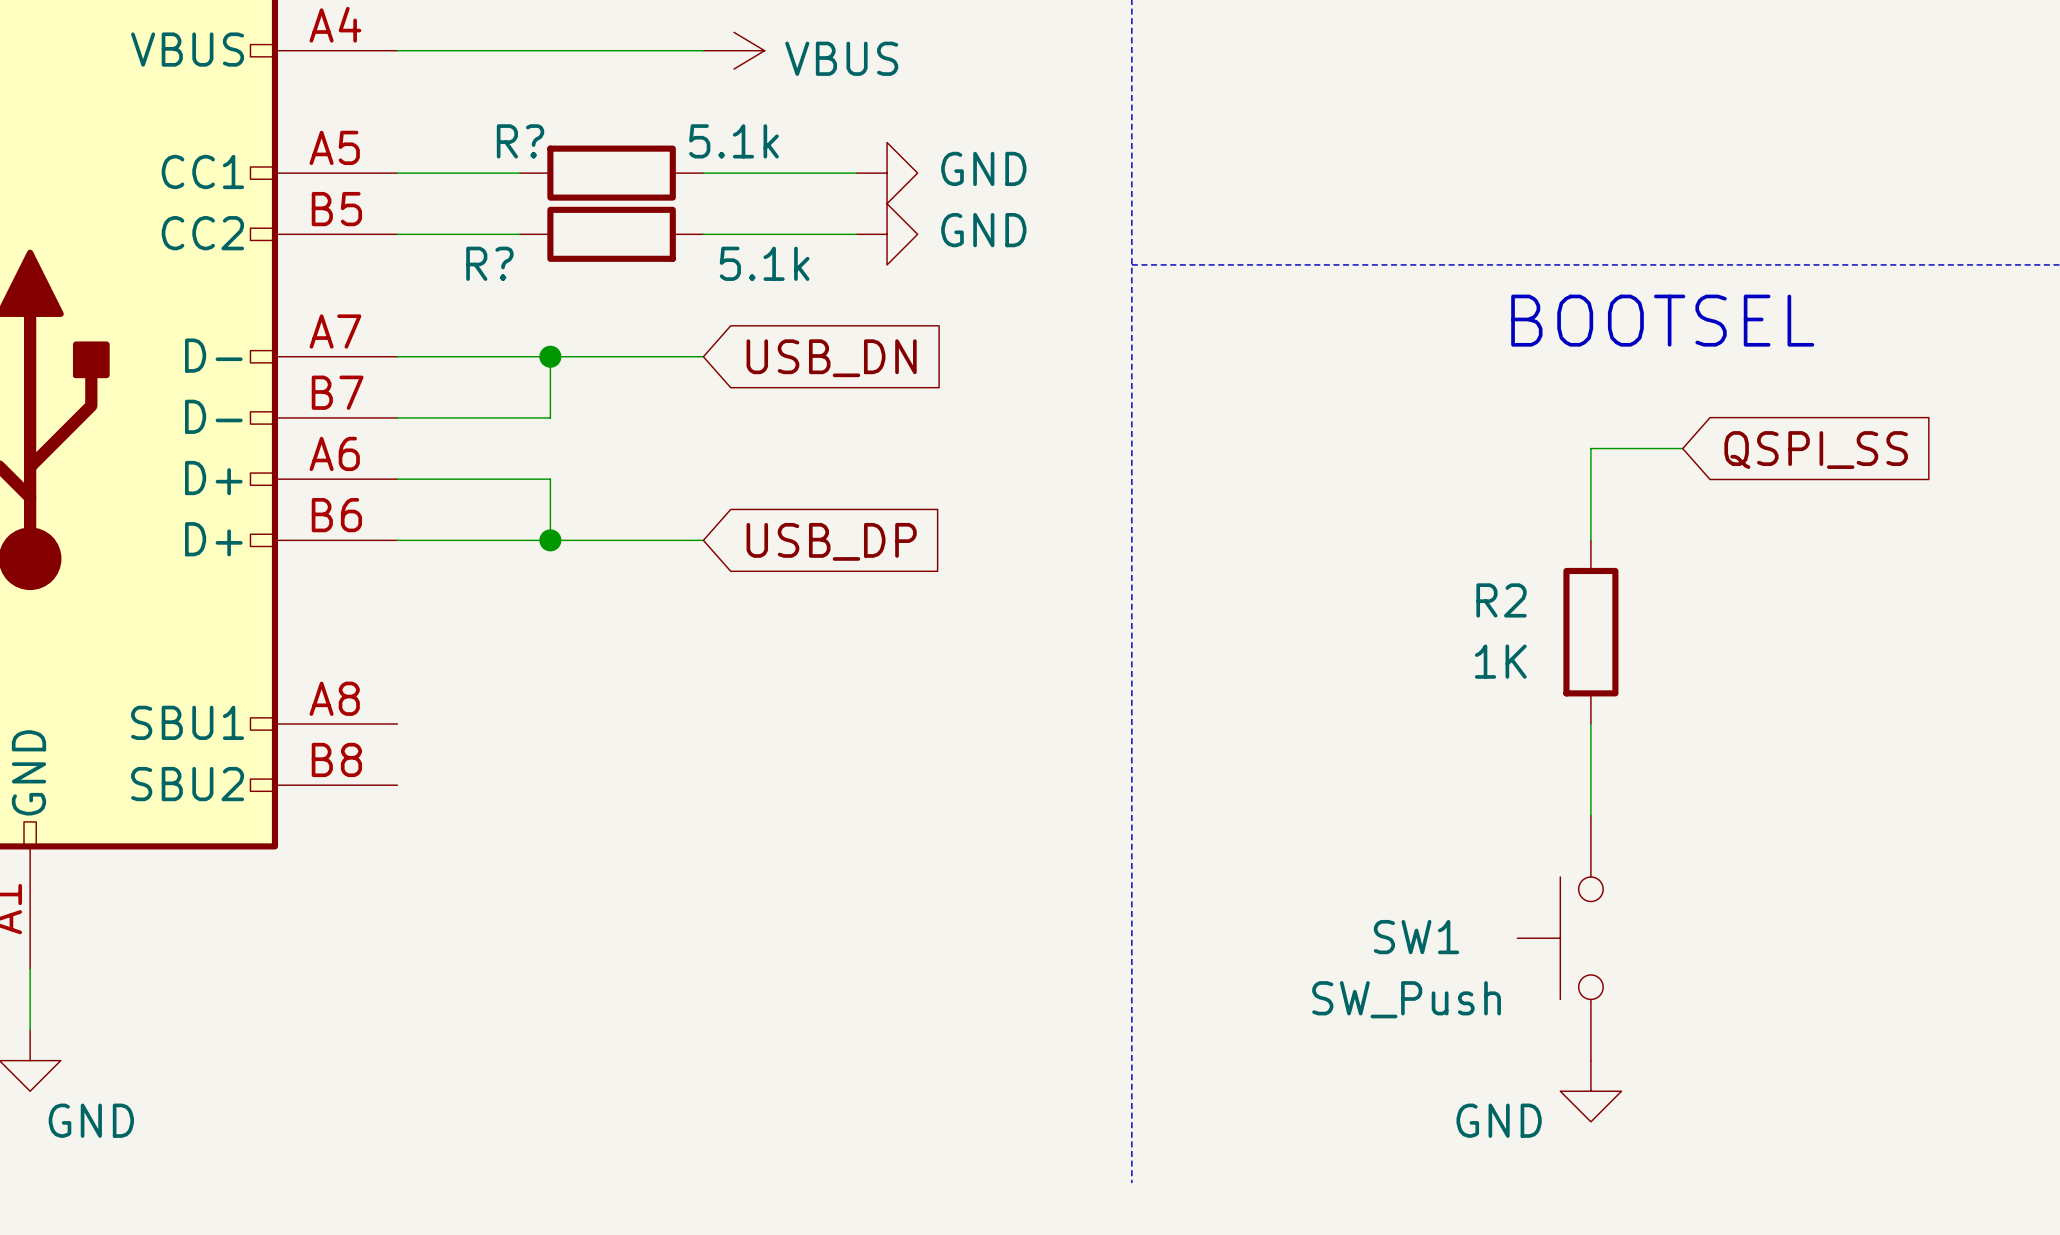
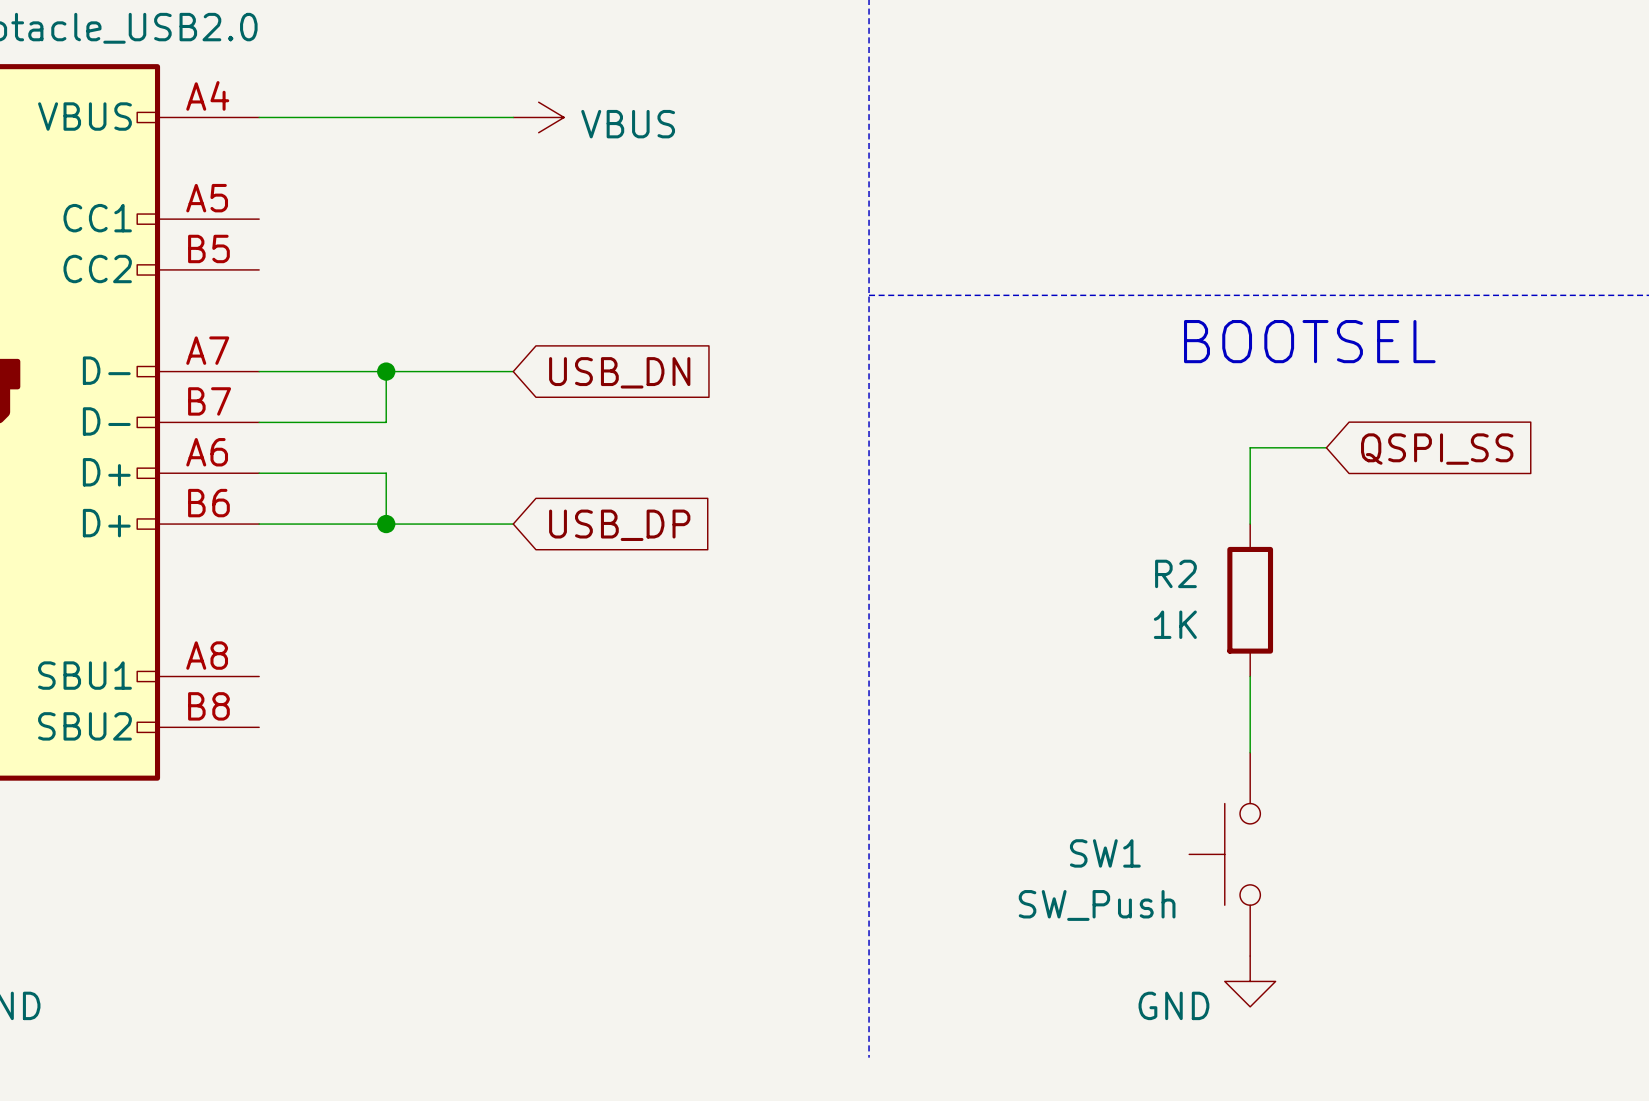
wire: (397, 173) (519, 173) -> none
R?: 5.1k (611, 173) -> none
wire: (703, 173) (856, 173) -> none
power symbol: GND (887, 173) -> none
wire: (397, 234) (519, 234) -> none
R?: 5.1k (611, 234) -> none
wire: (703, 234) (856, 234) -> none
power symbol: GND (887, 234) -> none

